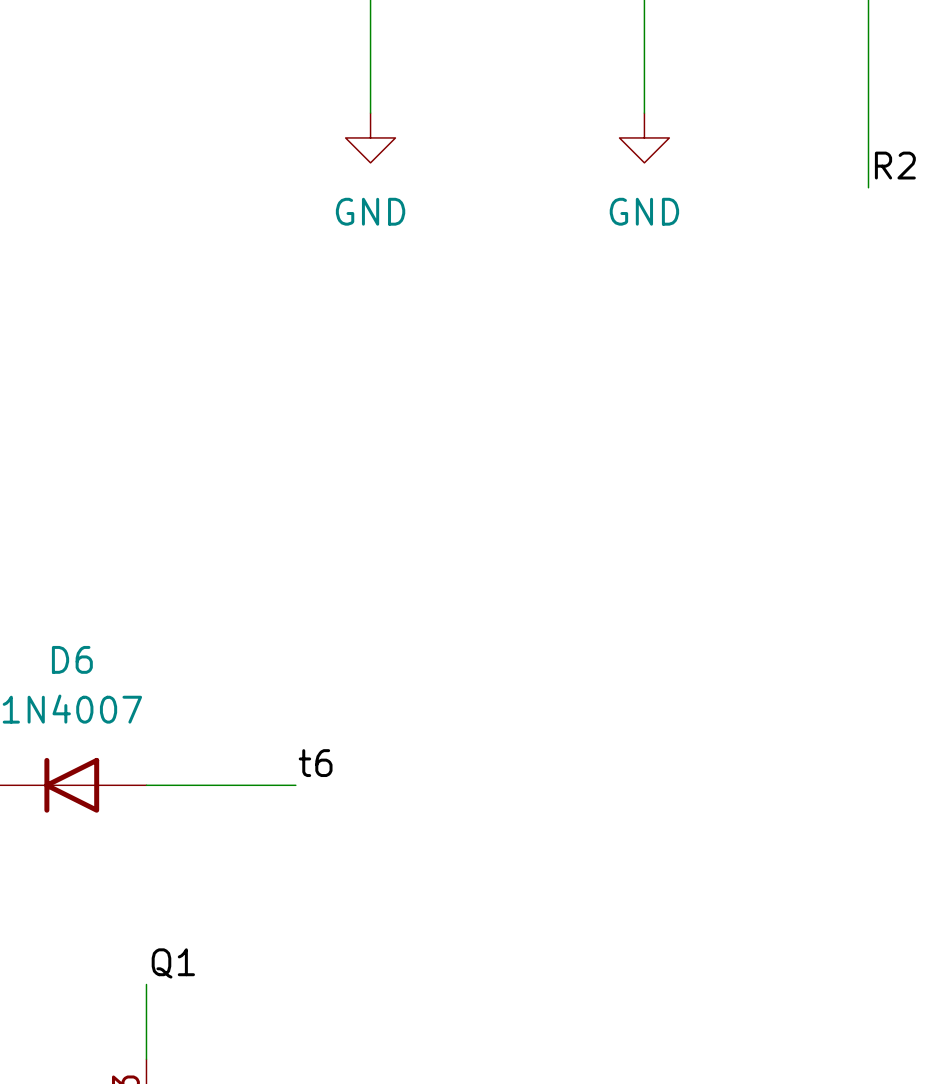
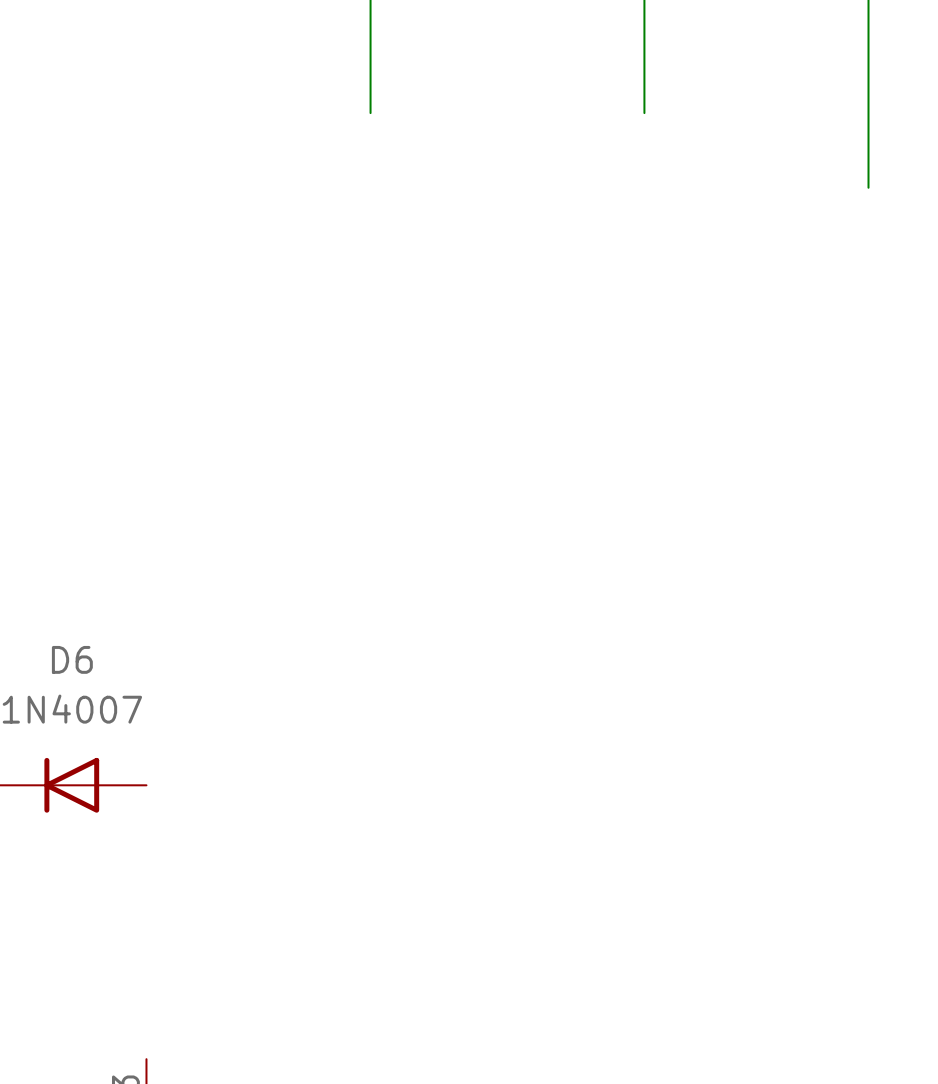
power symbol: GND (370, 137) -> none
power symbol: GND (644, 137) -> none
label: R2 (895, 165) -> none
label: t6 (315, 763) -> none
wire: (146, 785) (295, 785) -> none
label: Q1 (173, 963) -> none
wire: (146, 984) (146, 1059) -> none

